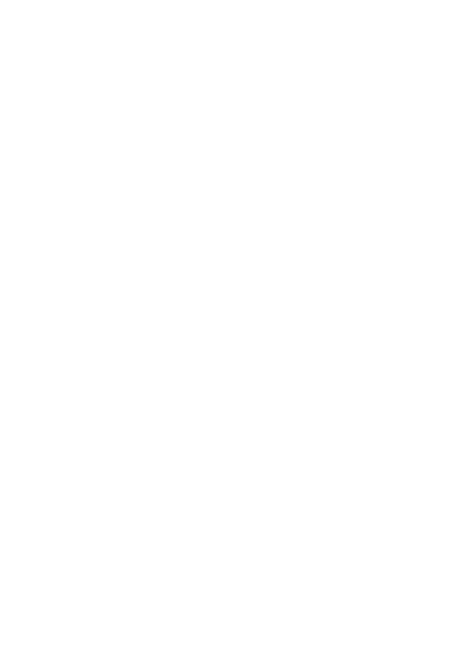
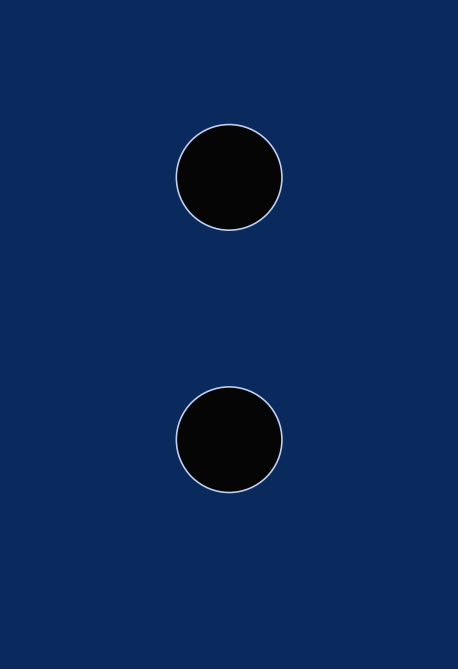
part: none -> (229, 177)
part: none -> (229, 439)

